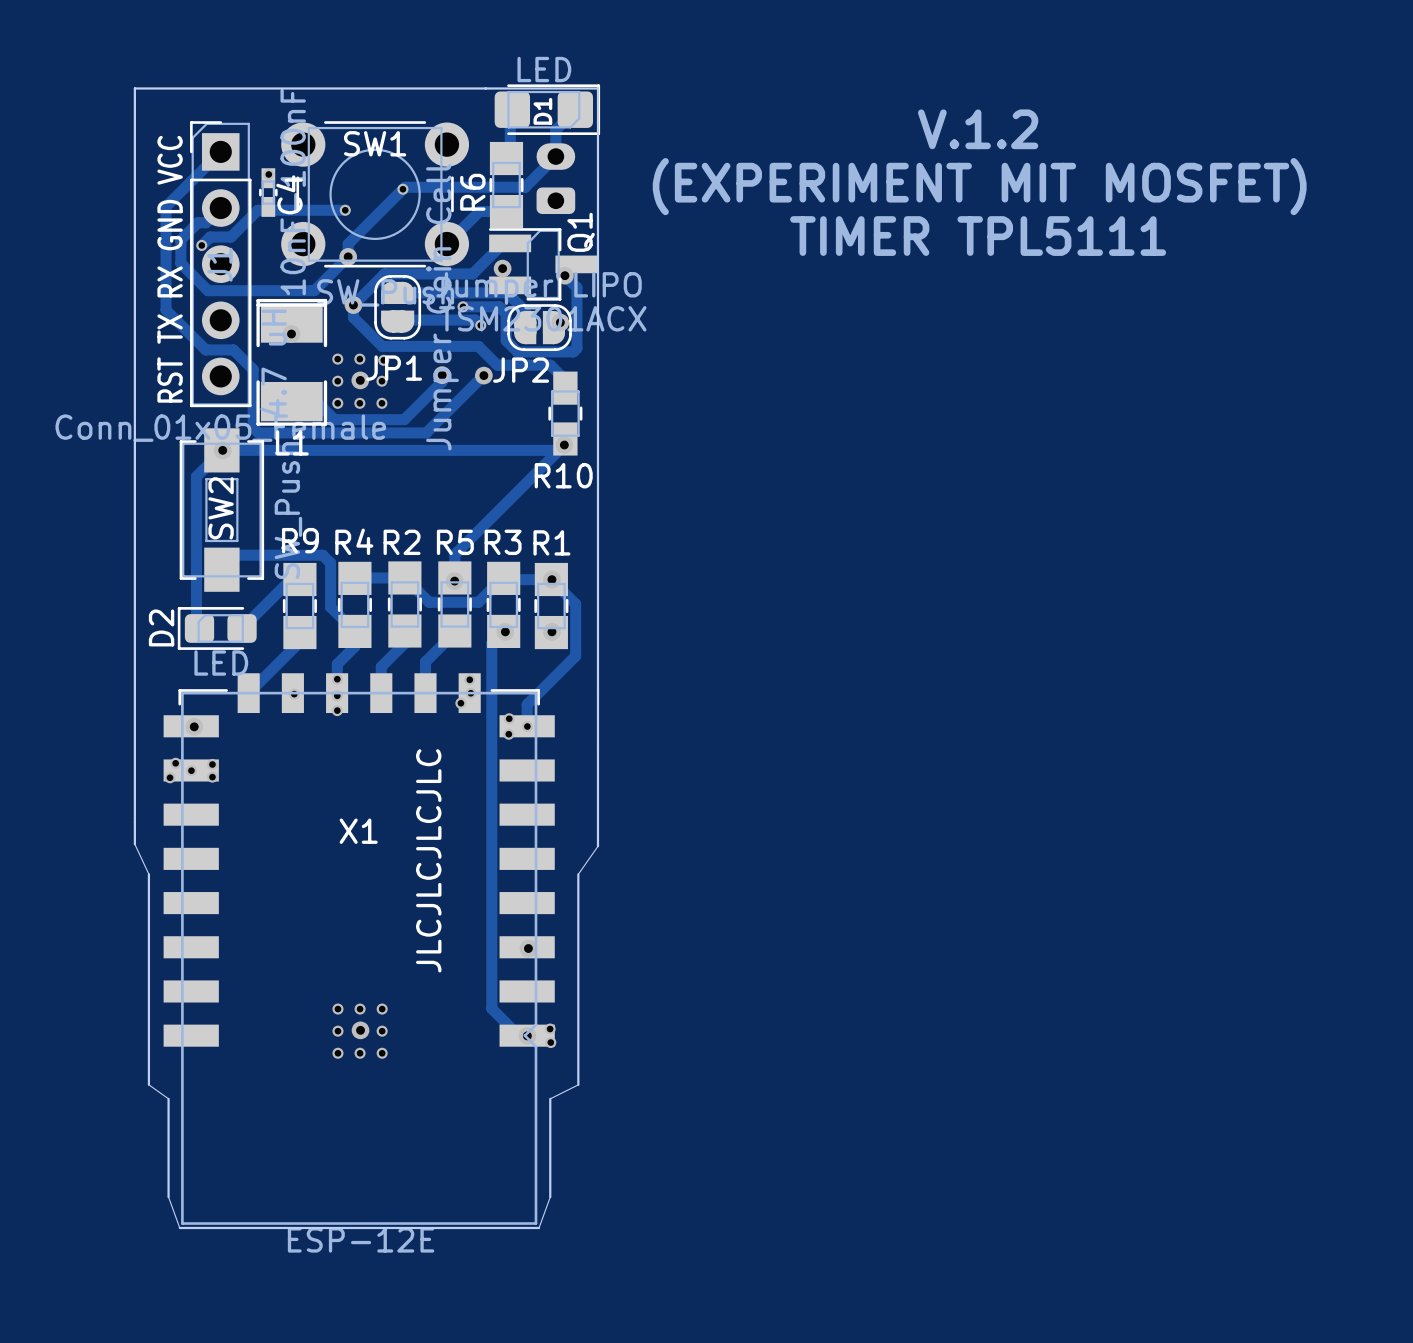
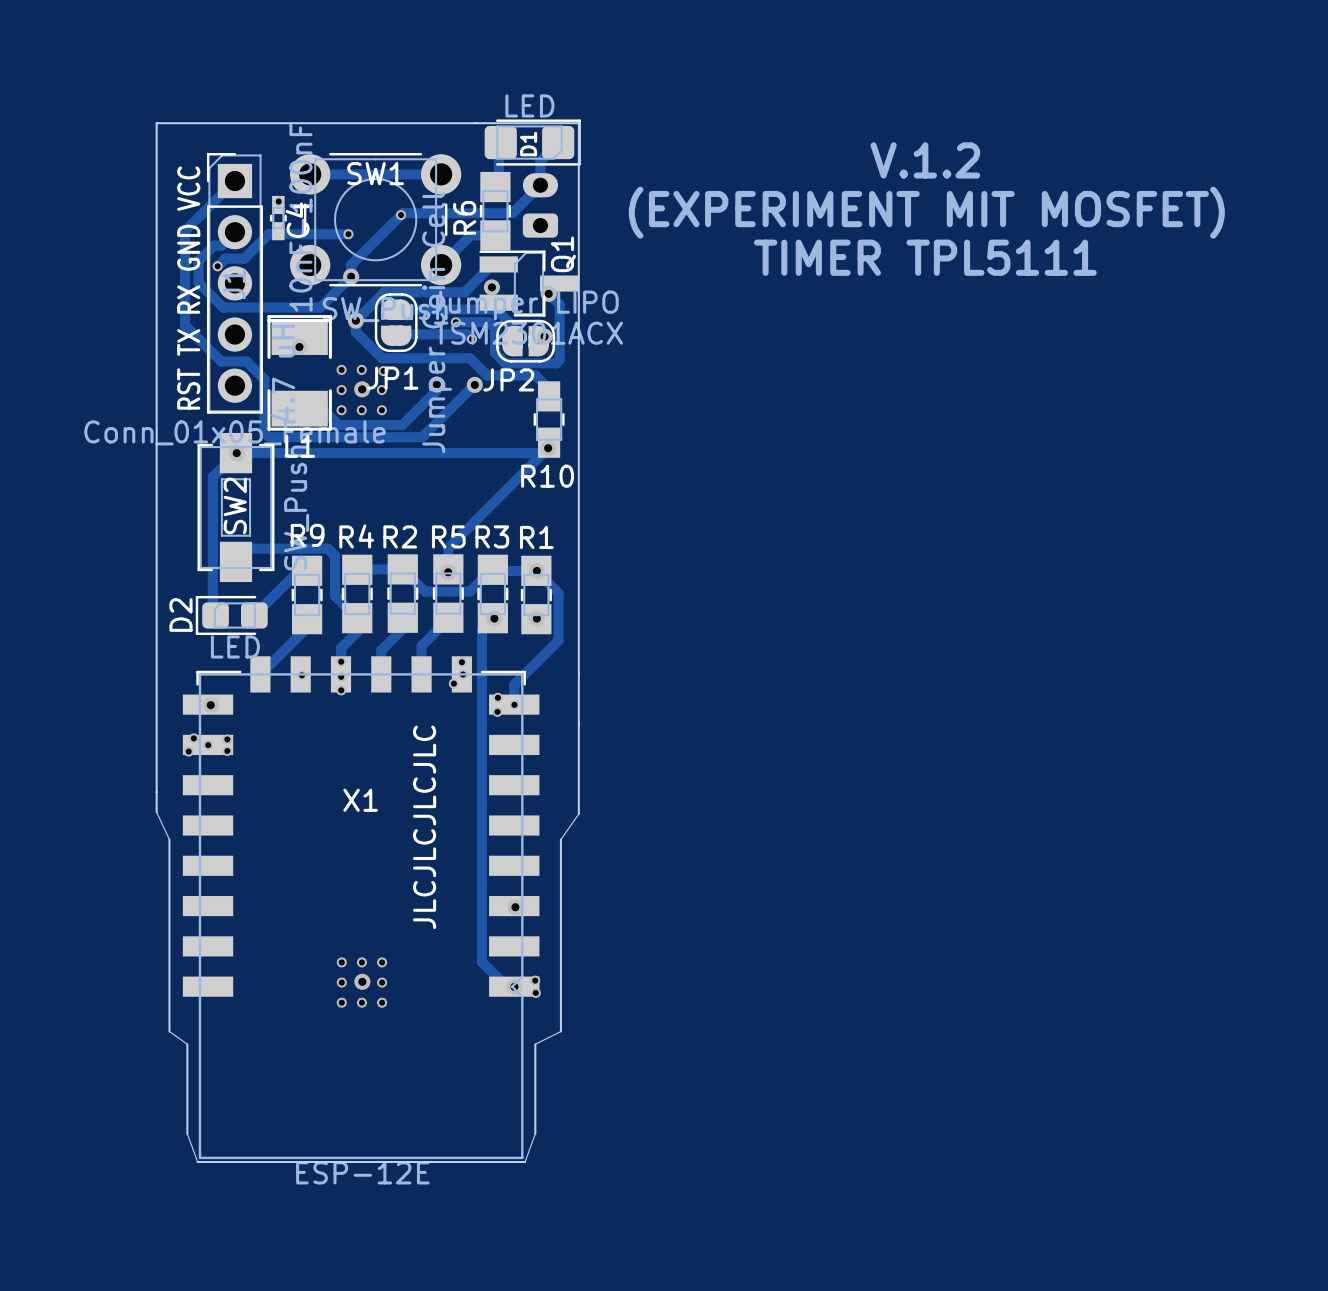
track: none -> (310, 174) (441, 174)

